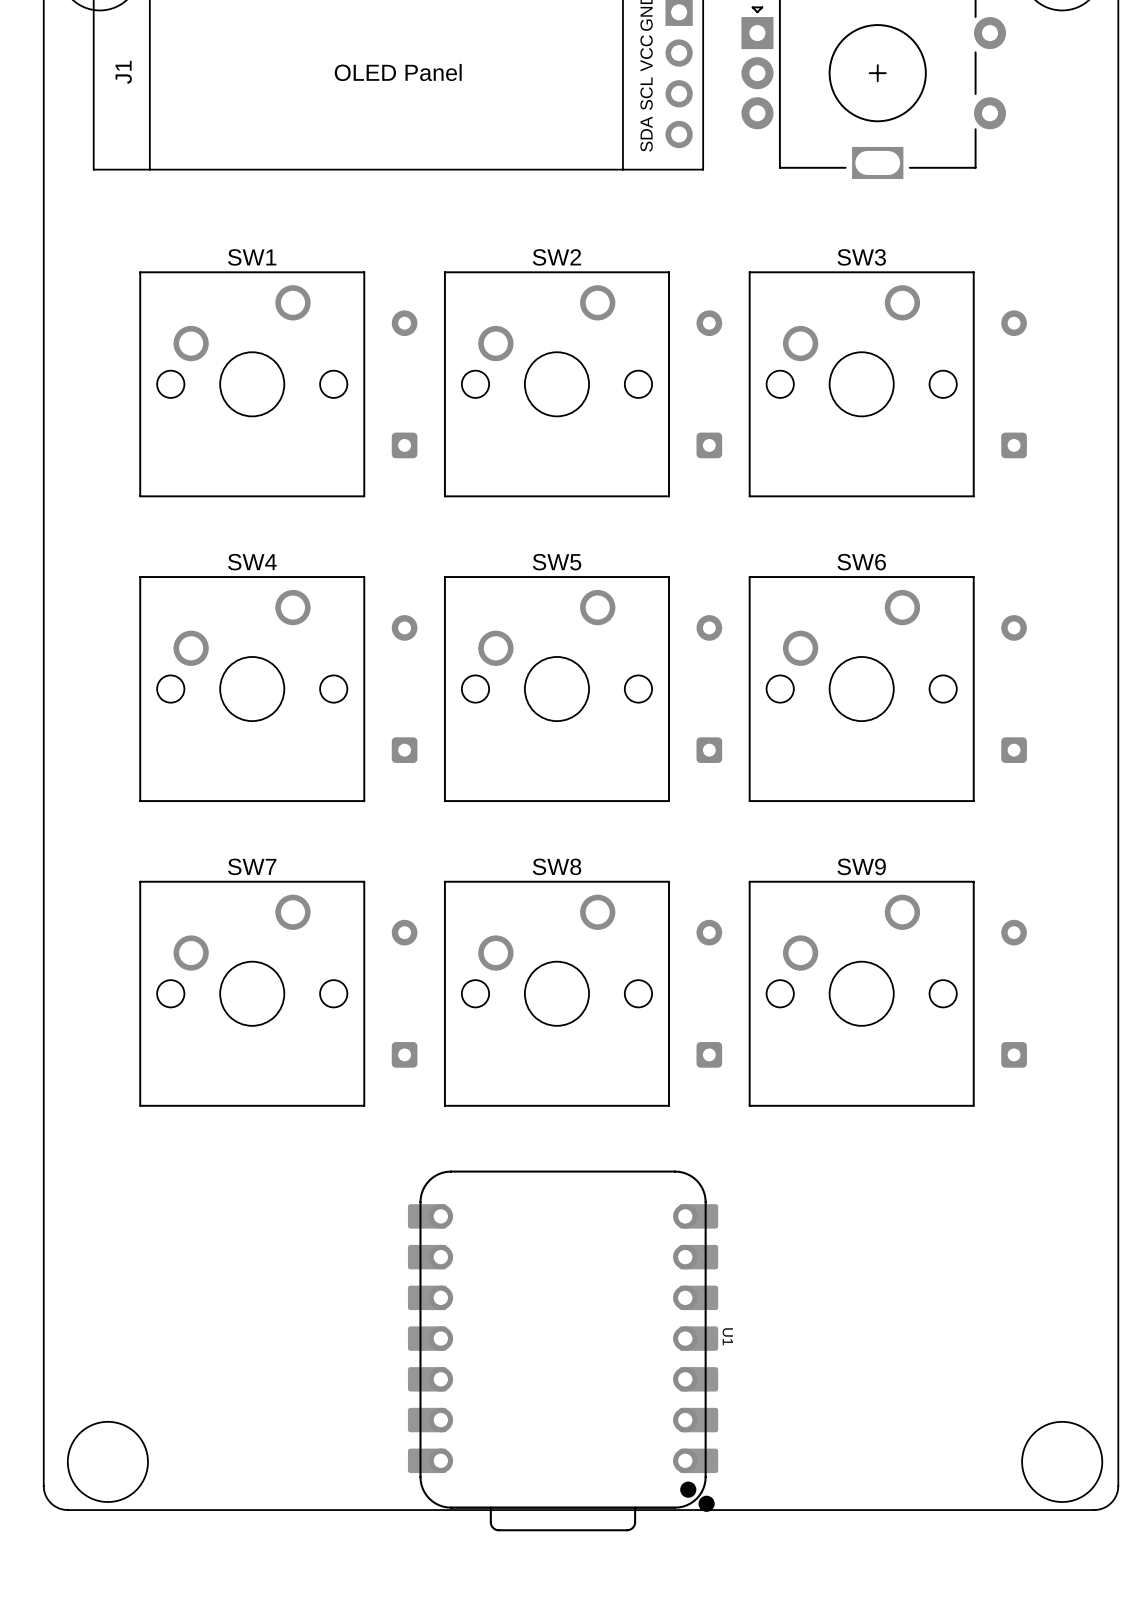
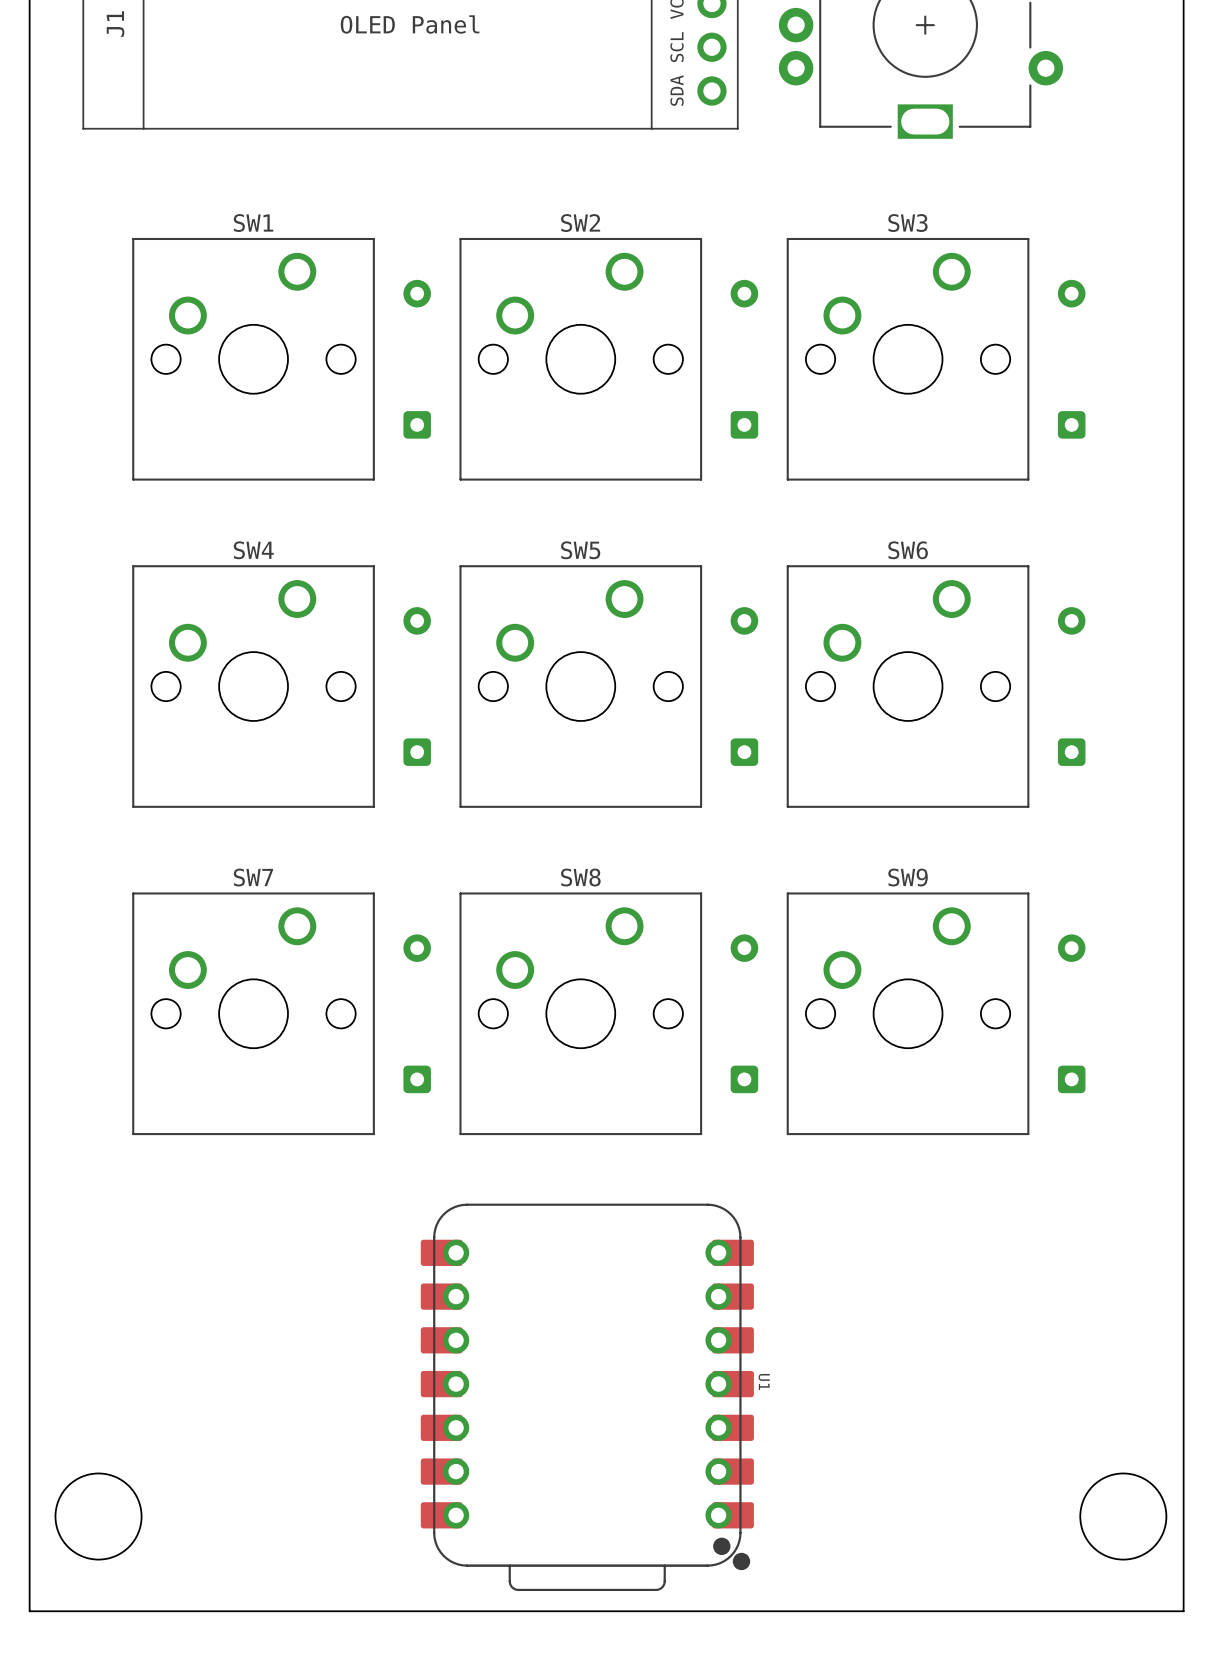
board edge: (43, 1485) (45, 1495) (50, 1503) (58, 1508) (67, 1510) (1094, 1510) (1103, 1508) (1111, 1503) (1116, 1495) (1118, 1485) -> (29, 1542) (29, 1611) (1183, 1611) (1183, 1542)

